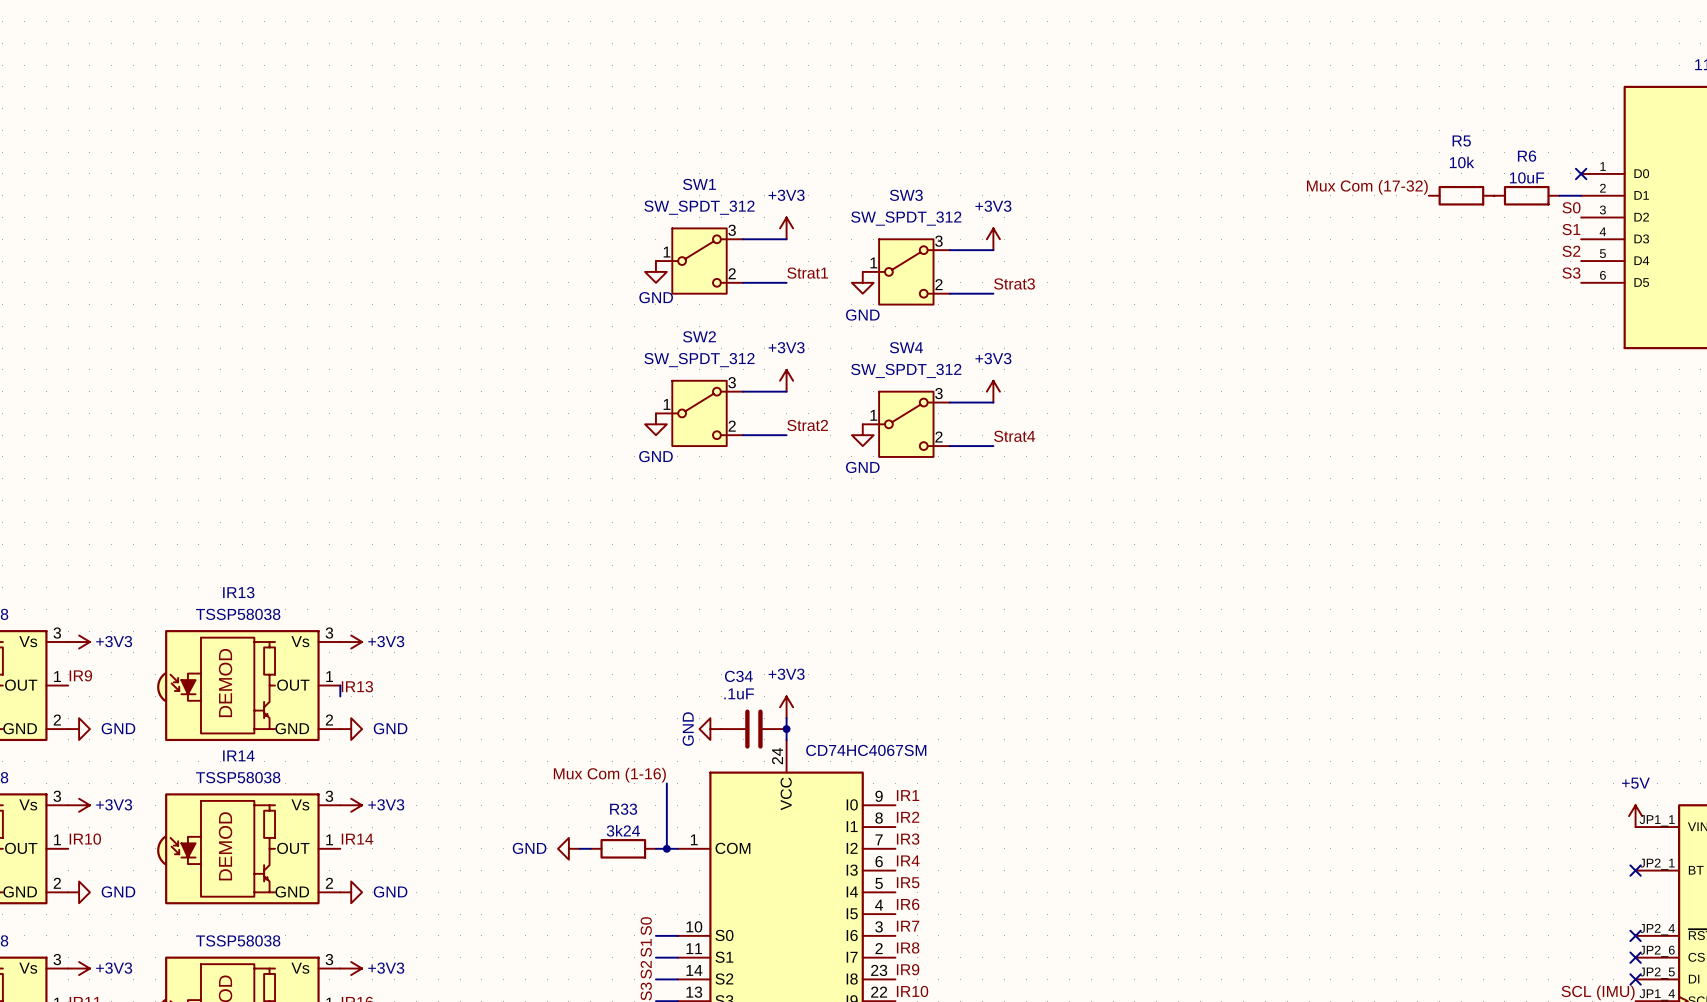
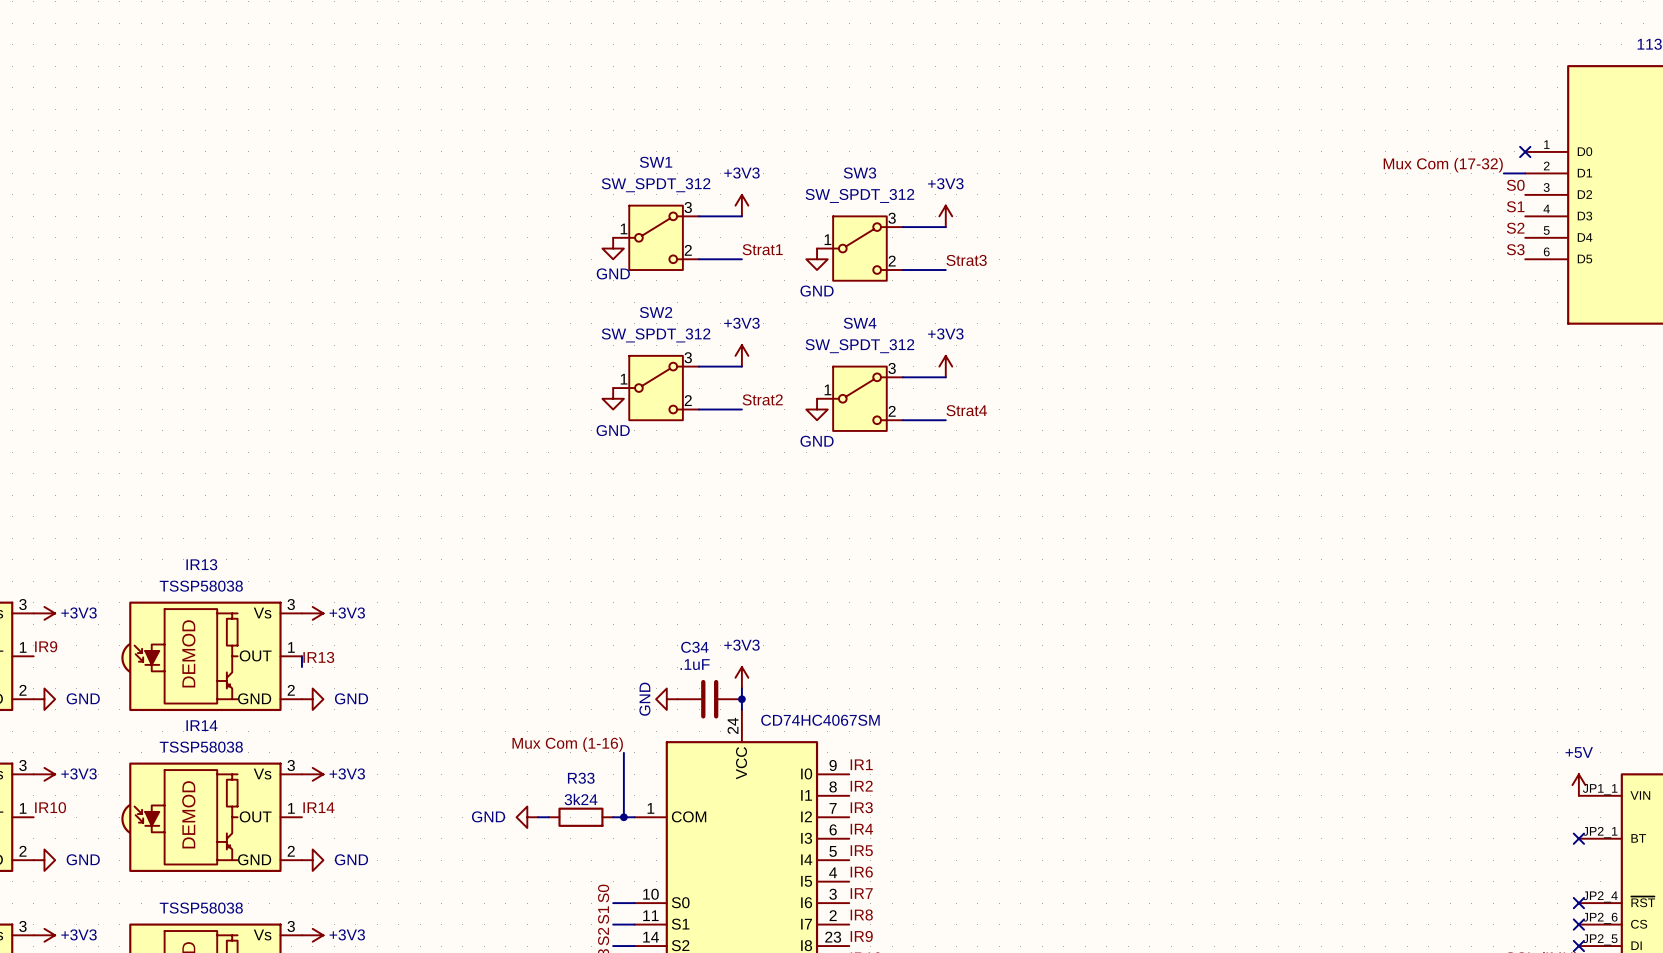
label position: Mux Com (17-32) (1367, 187) -> Mux Com (17-32) (1443, 165)
R5: 10k (1461, 195) -> none
R6: 10uF (1526, 195) -> none

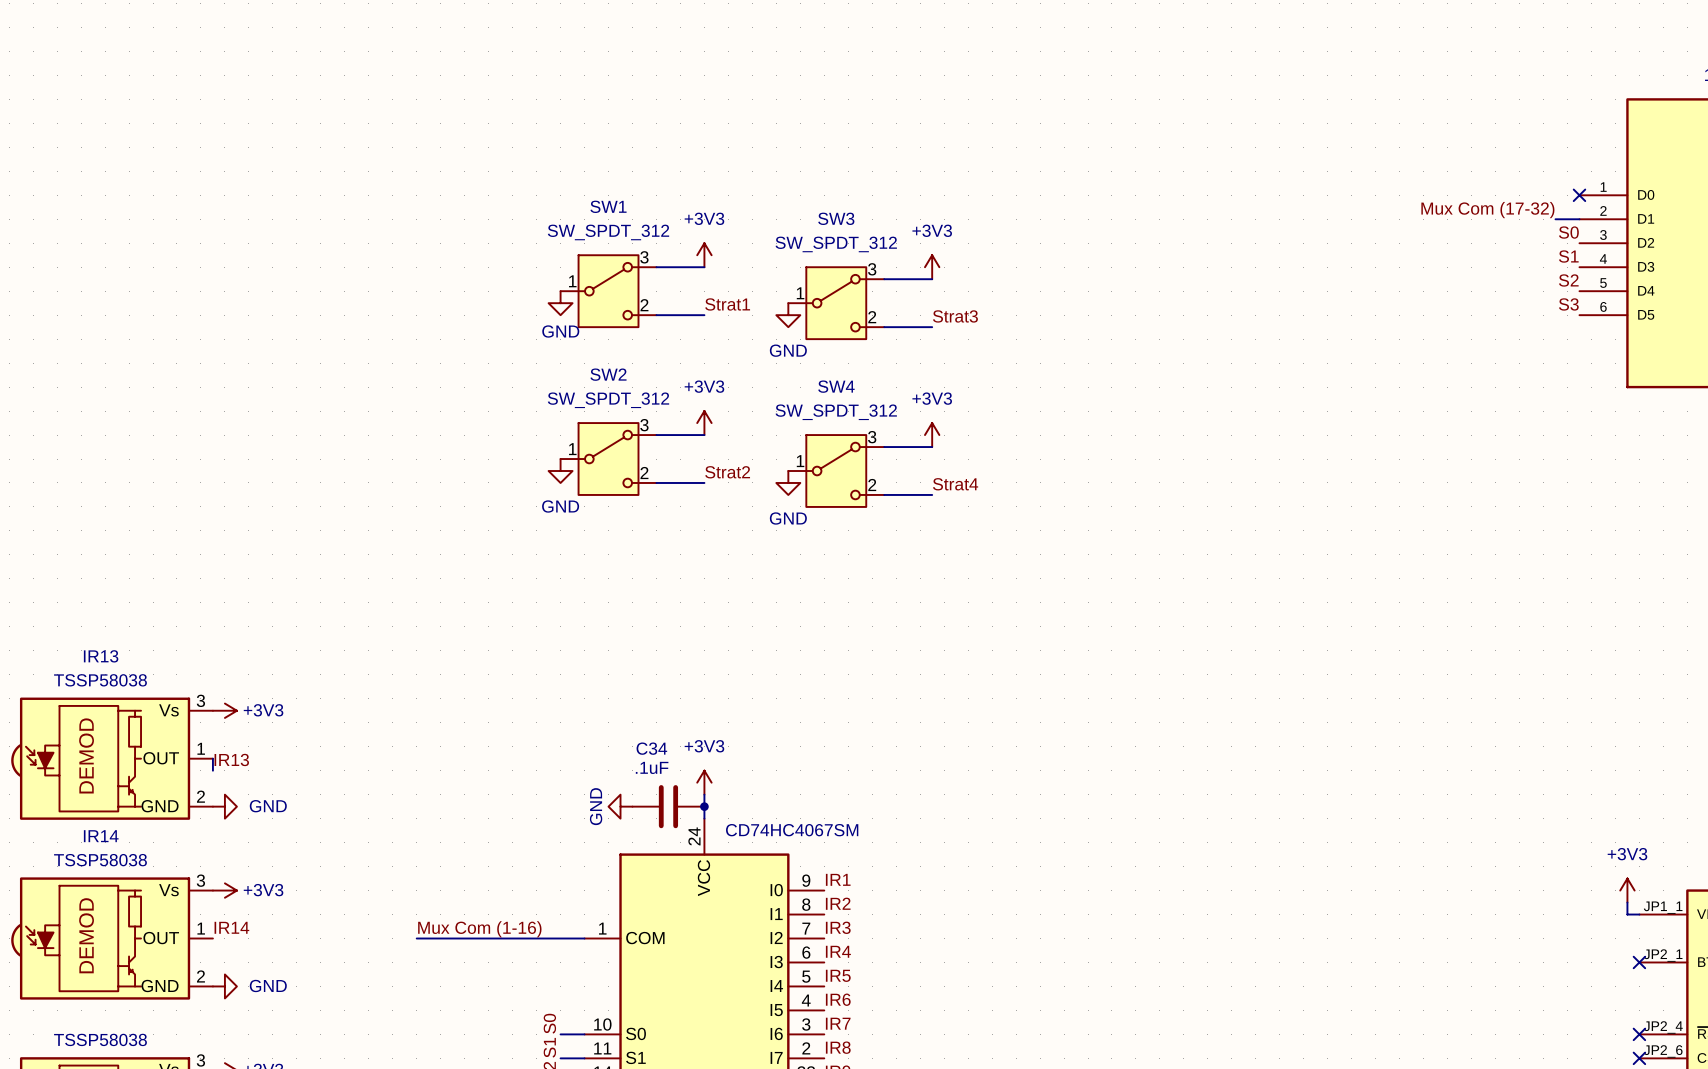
label position: Mux Com (1-16) (567, 744) -> Mux Com (1-16) (479, 929)
wire: (623, 752) (623, 817) -> none
power symbol: none -> +3V3 (1627, 890)
wire: none -> (1627, 902) (1627, 914) (1639, 914)
power symbol: +5V (1578, 785) -> none
wire: none -> (416, 938) (476, 938)
power symbol: GND (527, 817) -> none
wire: none -> (488, 938) (560, 938)
R33: 3k24 (580, 817) -> none
junction: (623, 817) -> none

